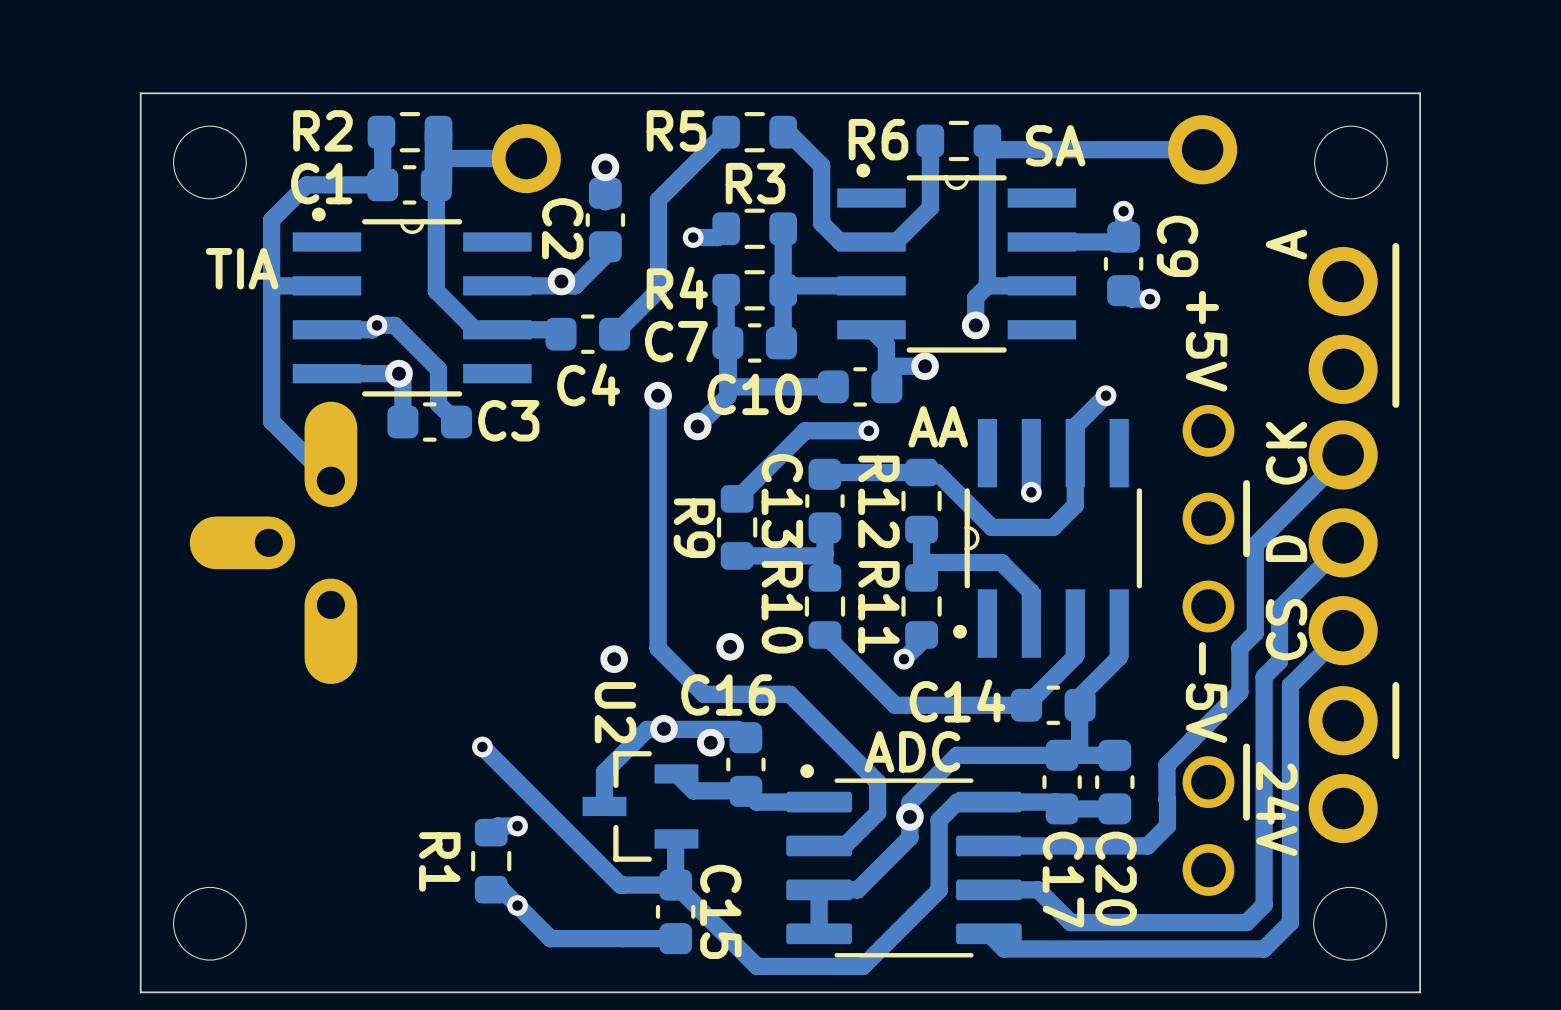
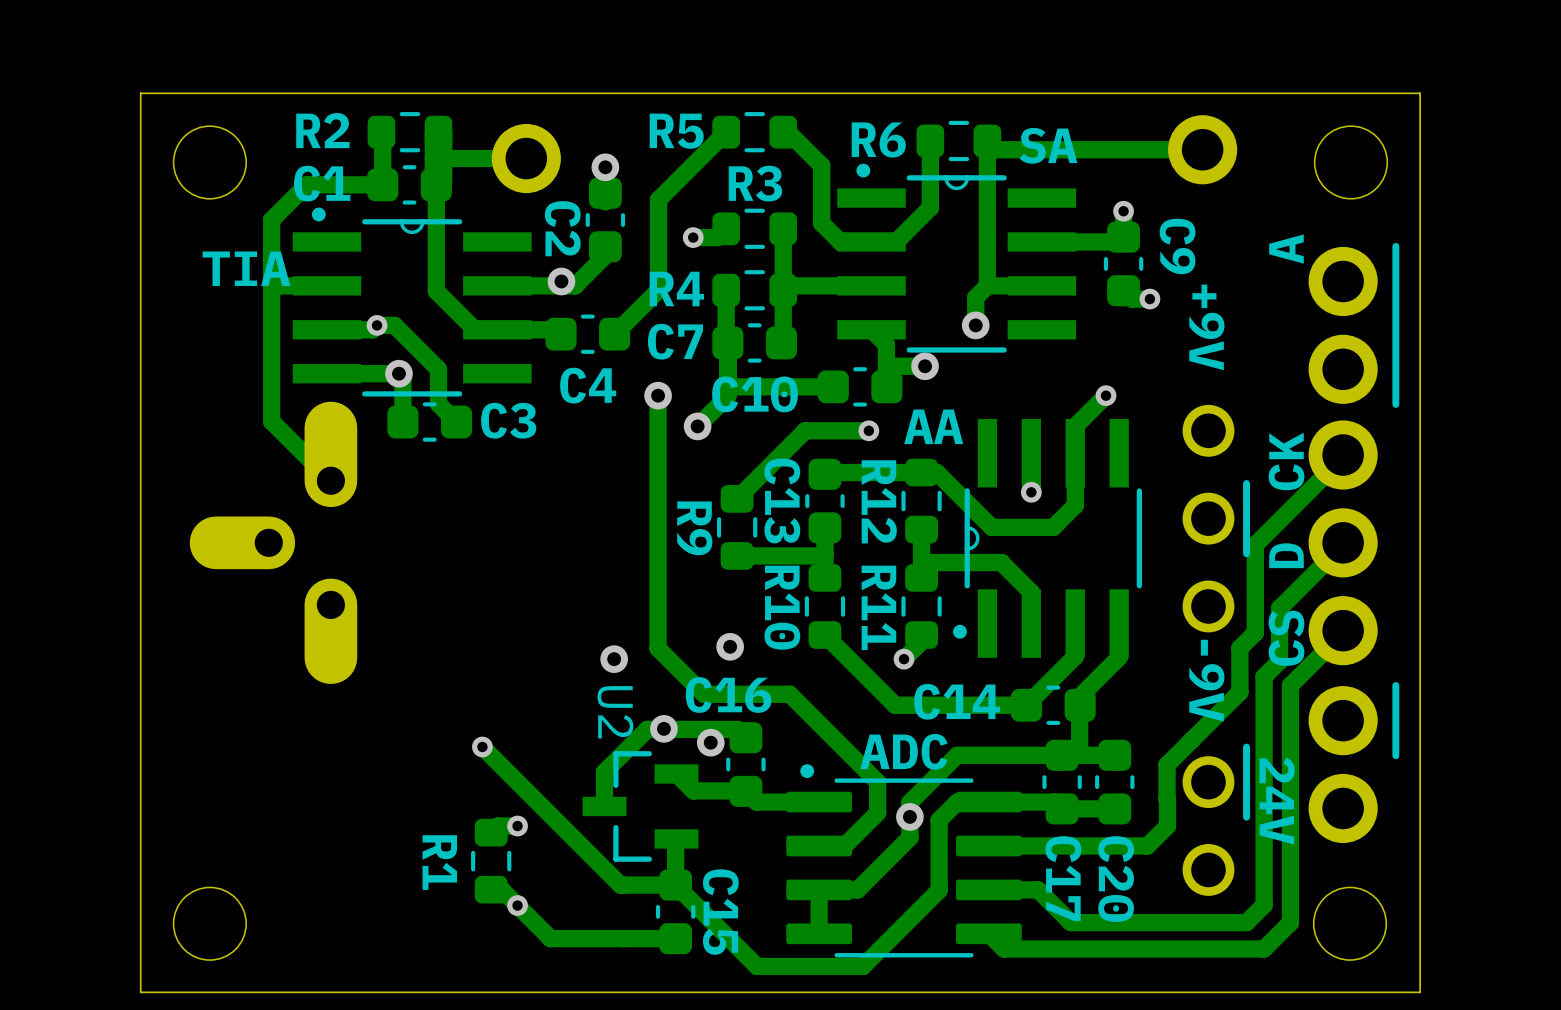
text: +5V (1206, 341) -> +9V (1206, 327)
text: -5V (1206, 692) -> -9V (1206, 680)

